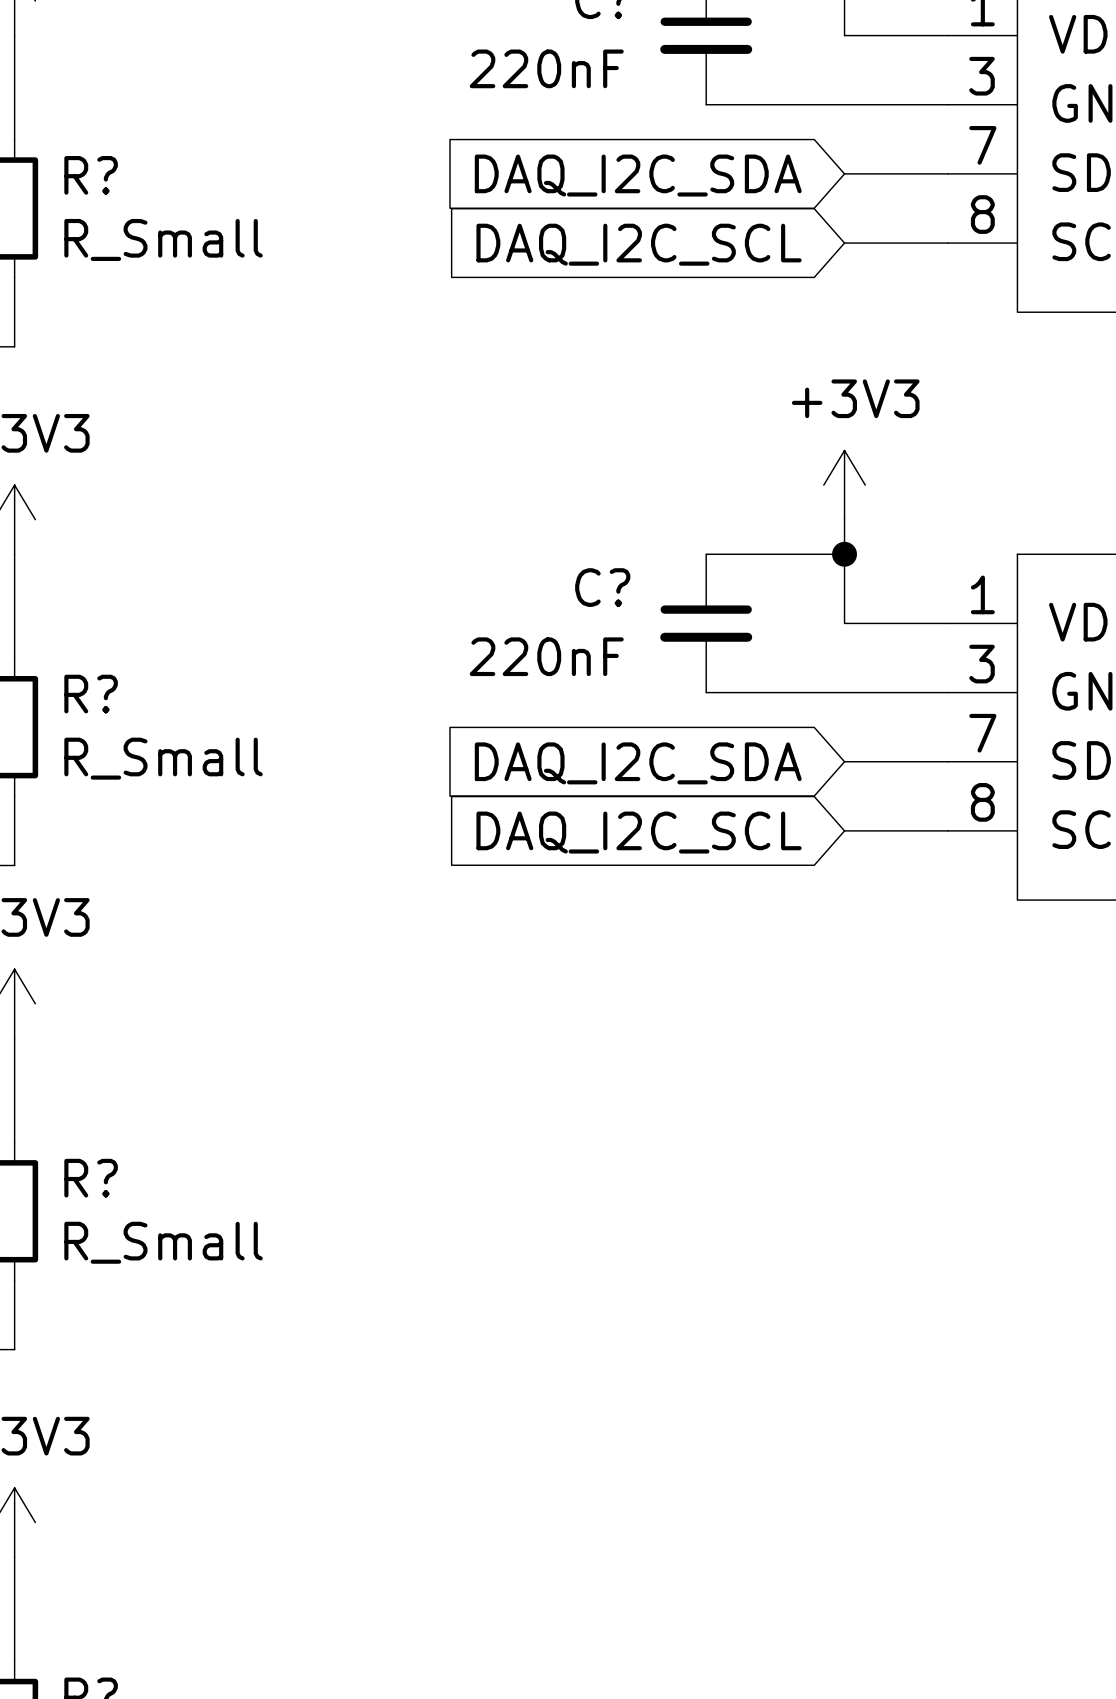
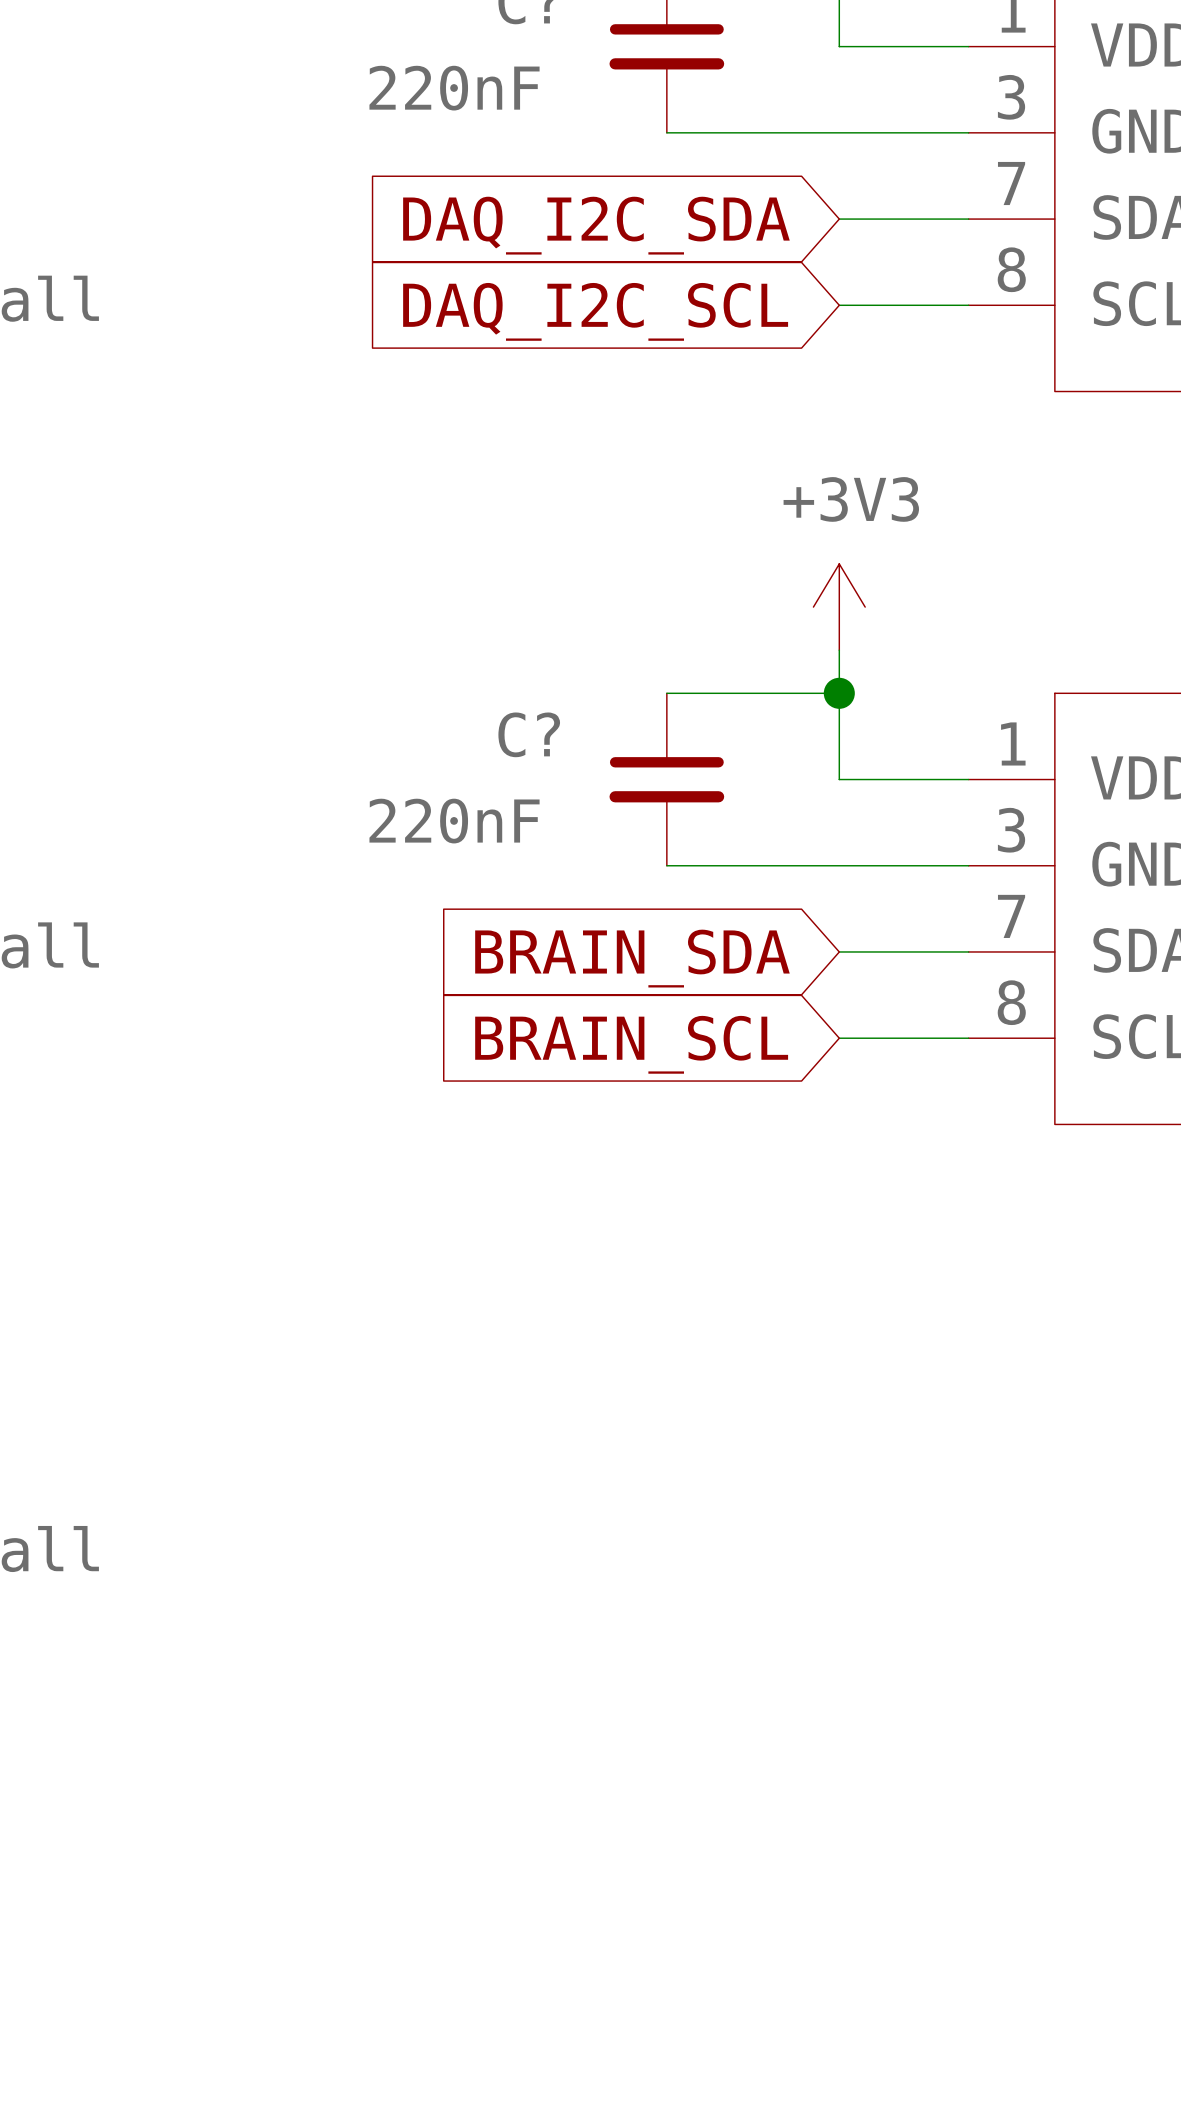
global label: DAQ_I2C_SDA (638, 763) -> BRAIN_SDA (632, 958)
global label: DAQ_I2C_SCL (639, 832) -> BRAIN_SCL (631, 1044)

